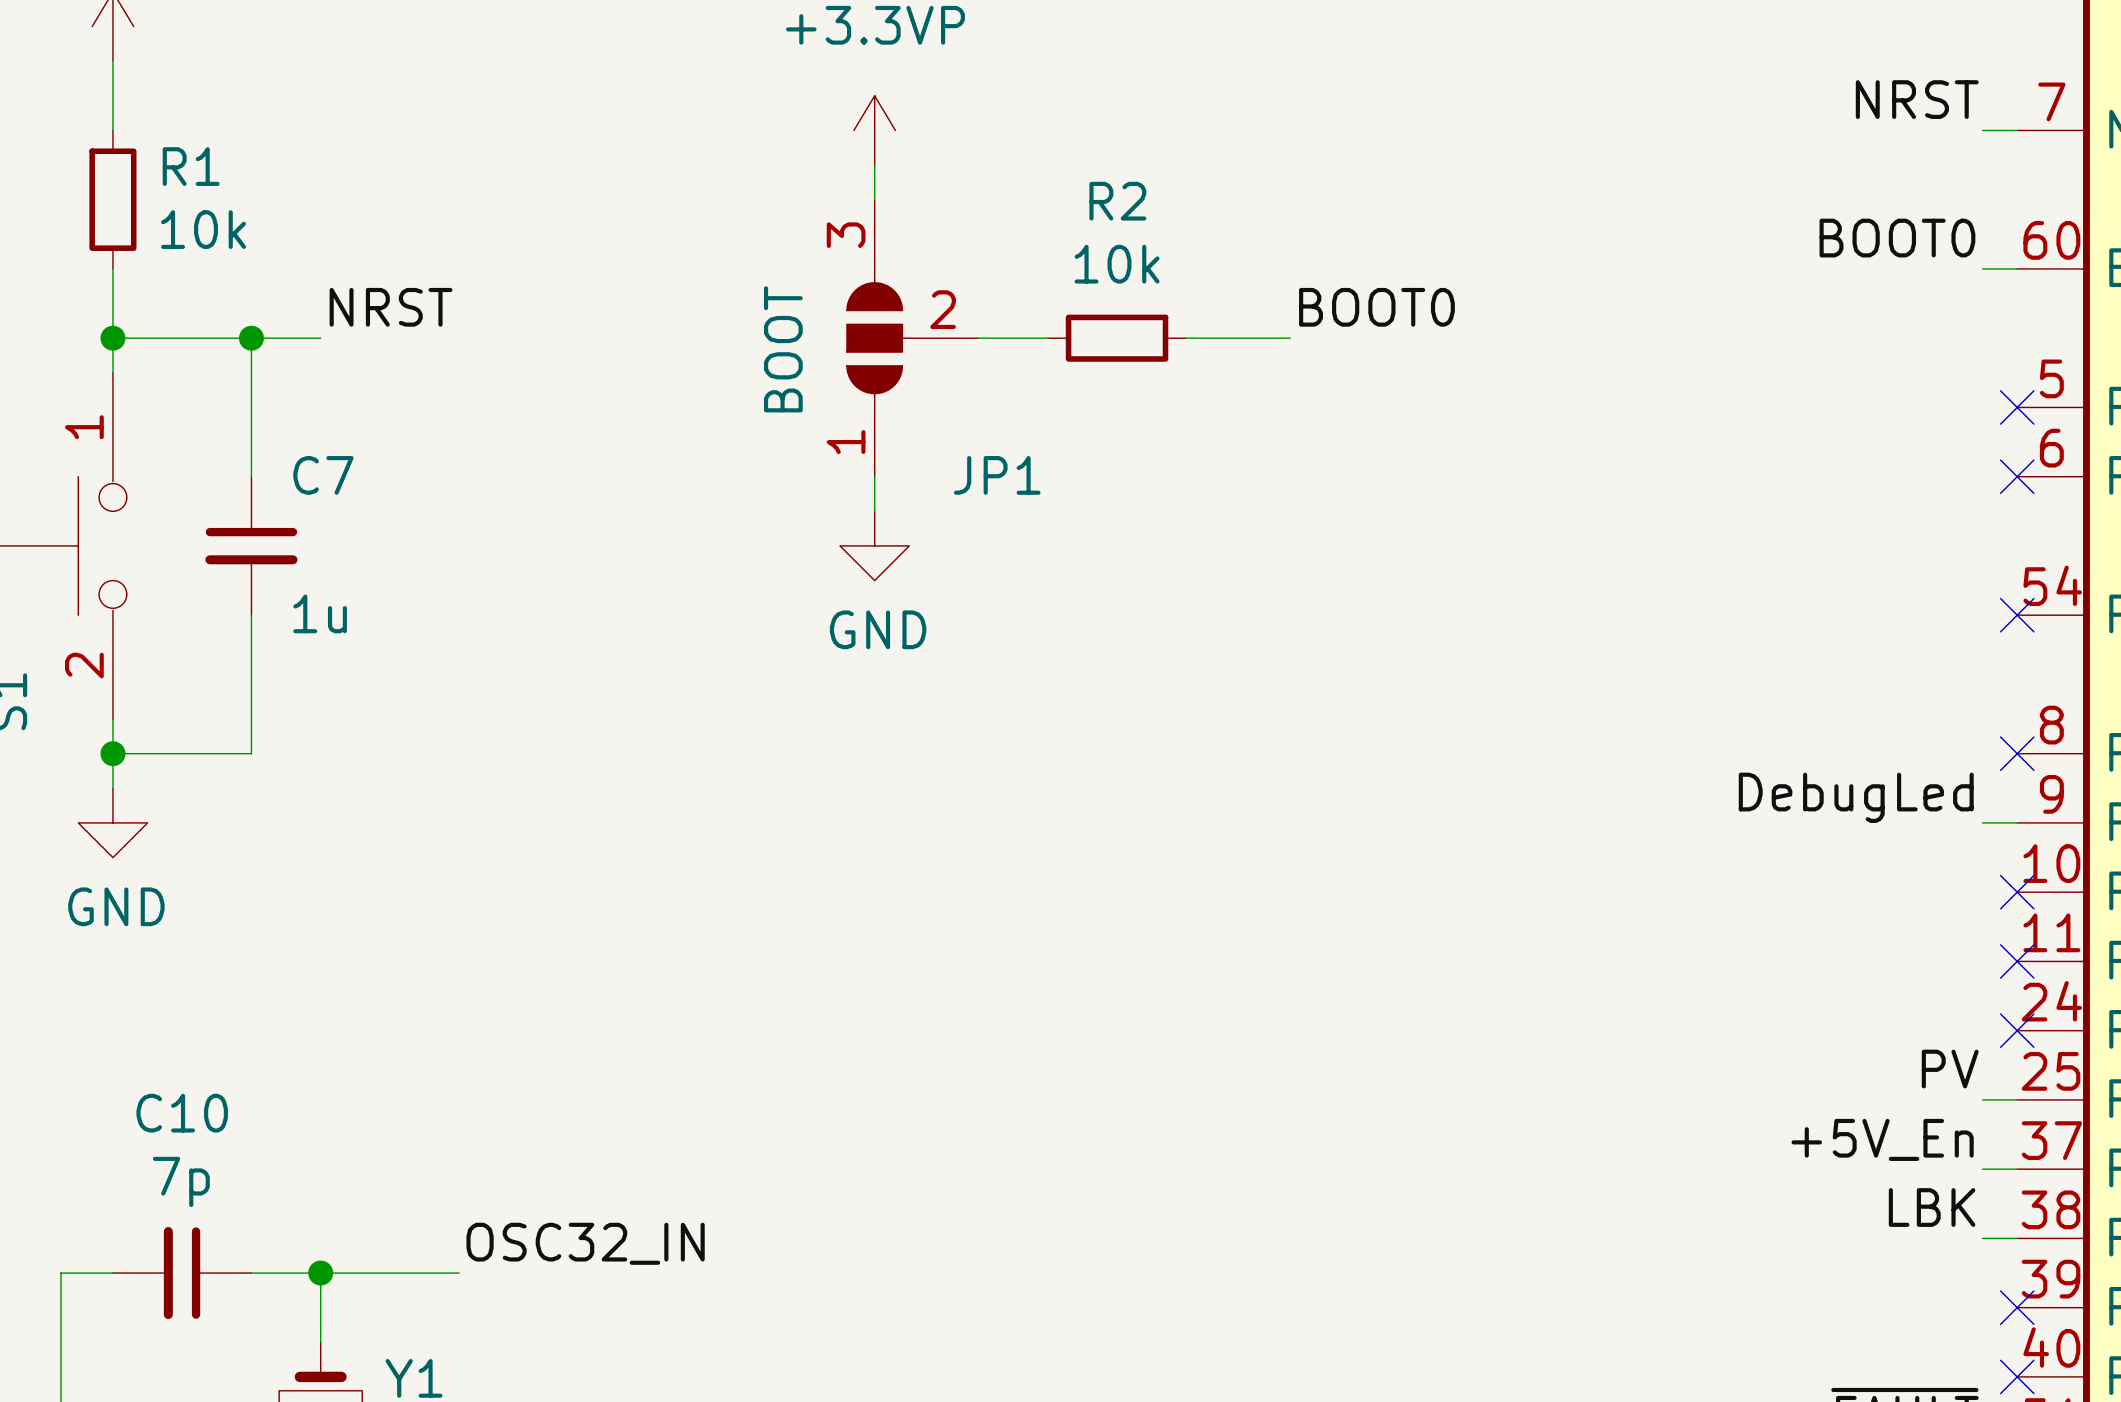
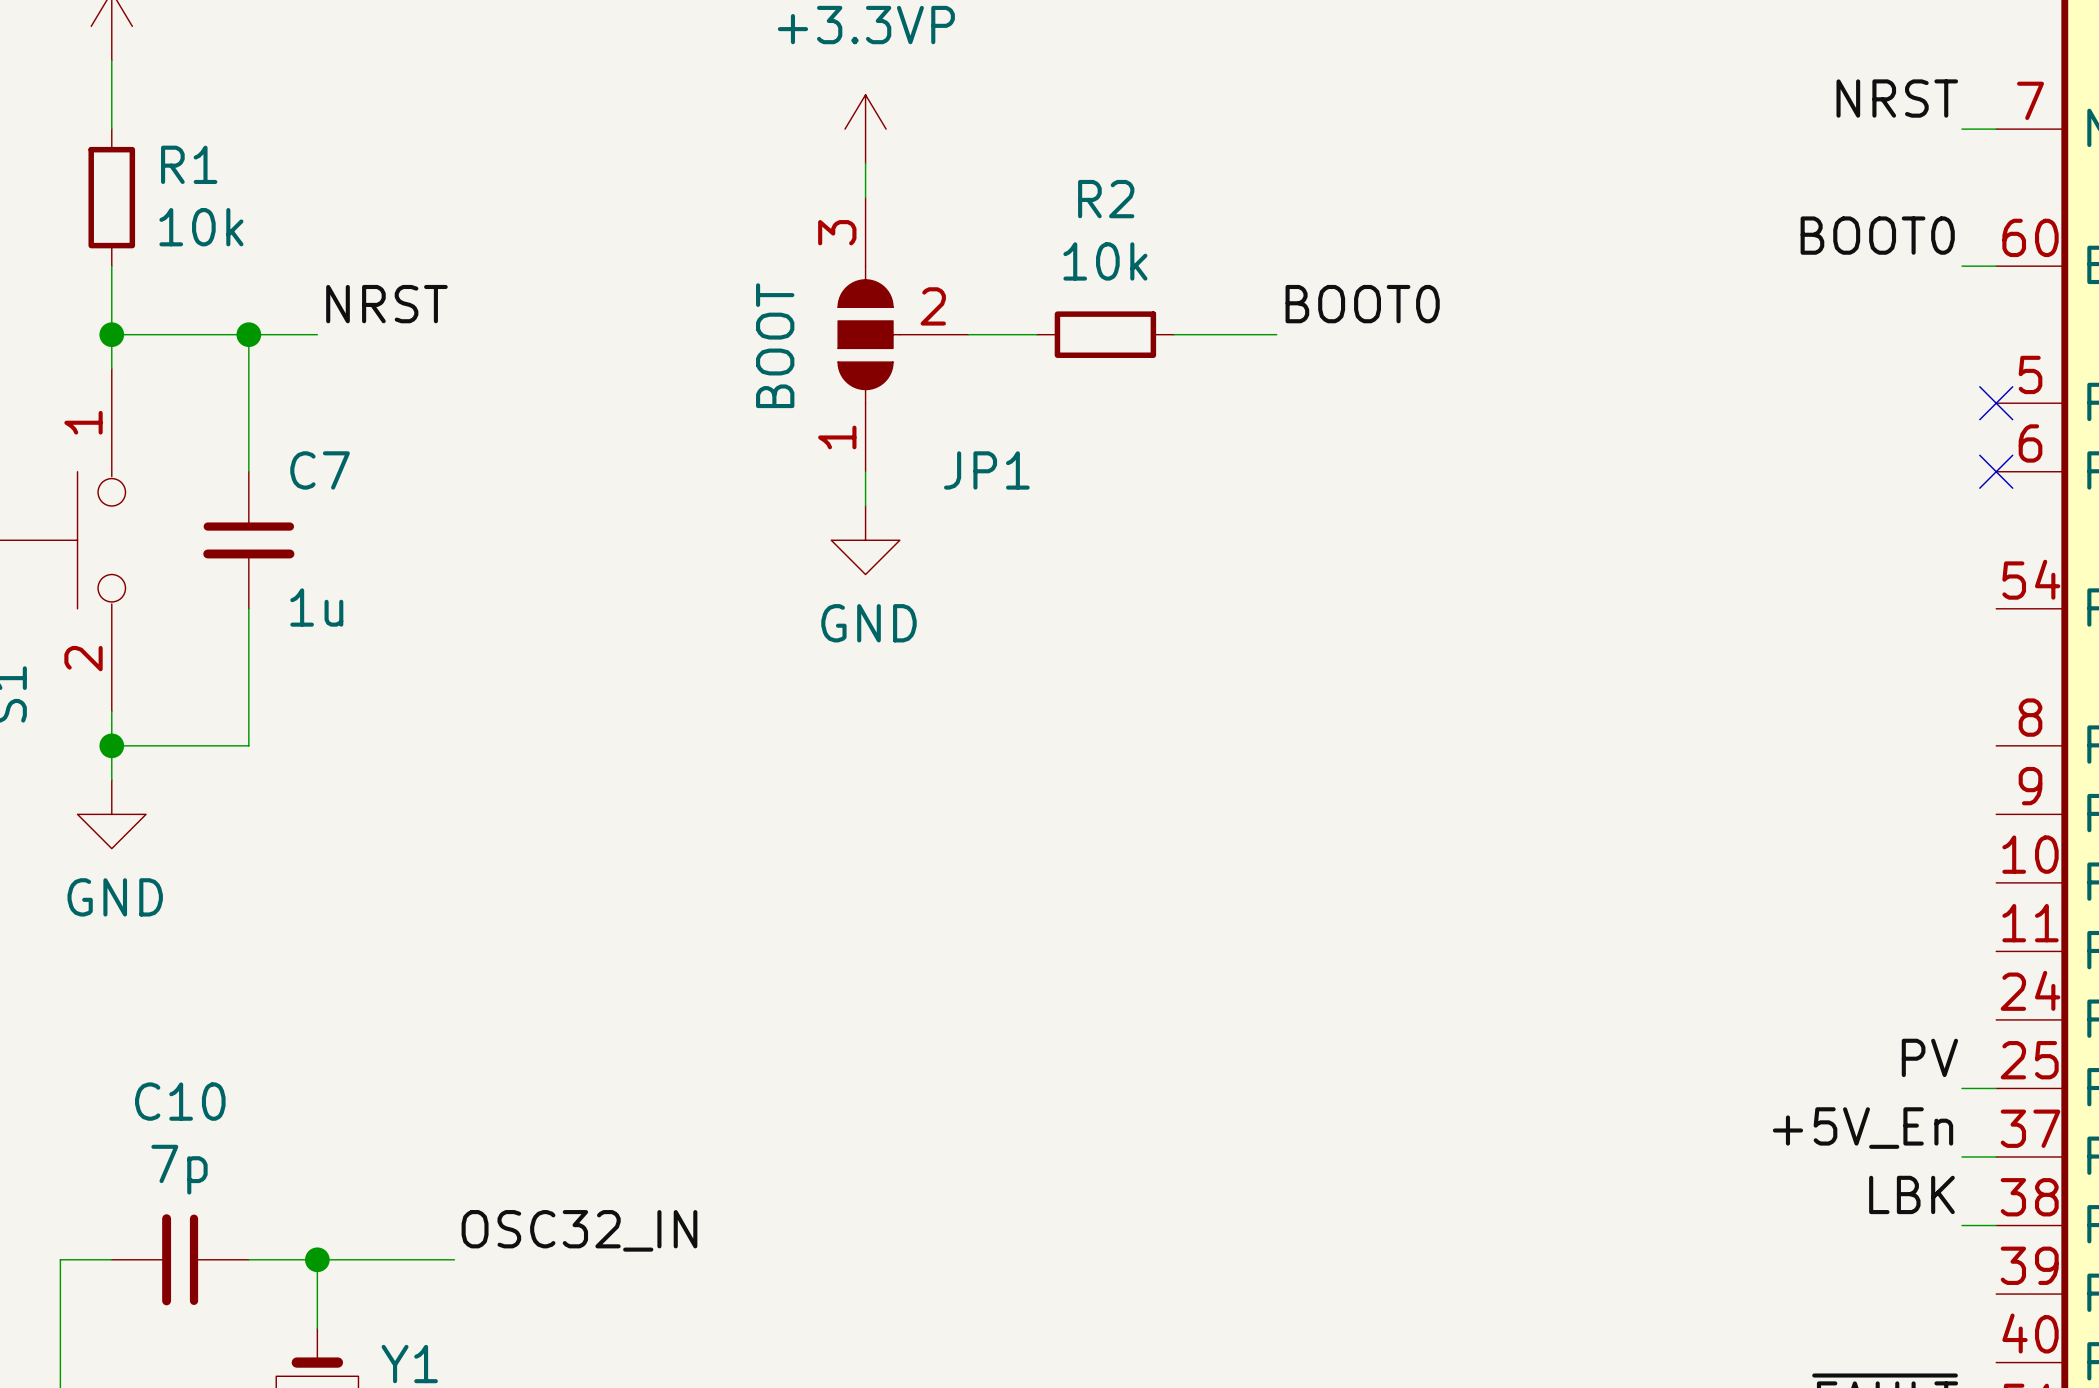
no-connect mark: (2017, 615) -> none
no-connect mark: (2017, 753) -> none
label: DebugLed (1856, 797) -> none
wire: (1982, 822) (2017, 822) -> none
no-connect mark: (2017, 892) -> none
no-connect mark: (2017, 961) -> none
no-connect mark: (2017, 1030) -> none
no-connect mark: (2017, 1307) -> none
no-connect mark: (2017, 1376) -> none

